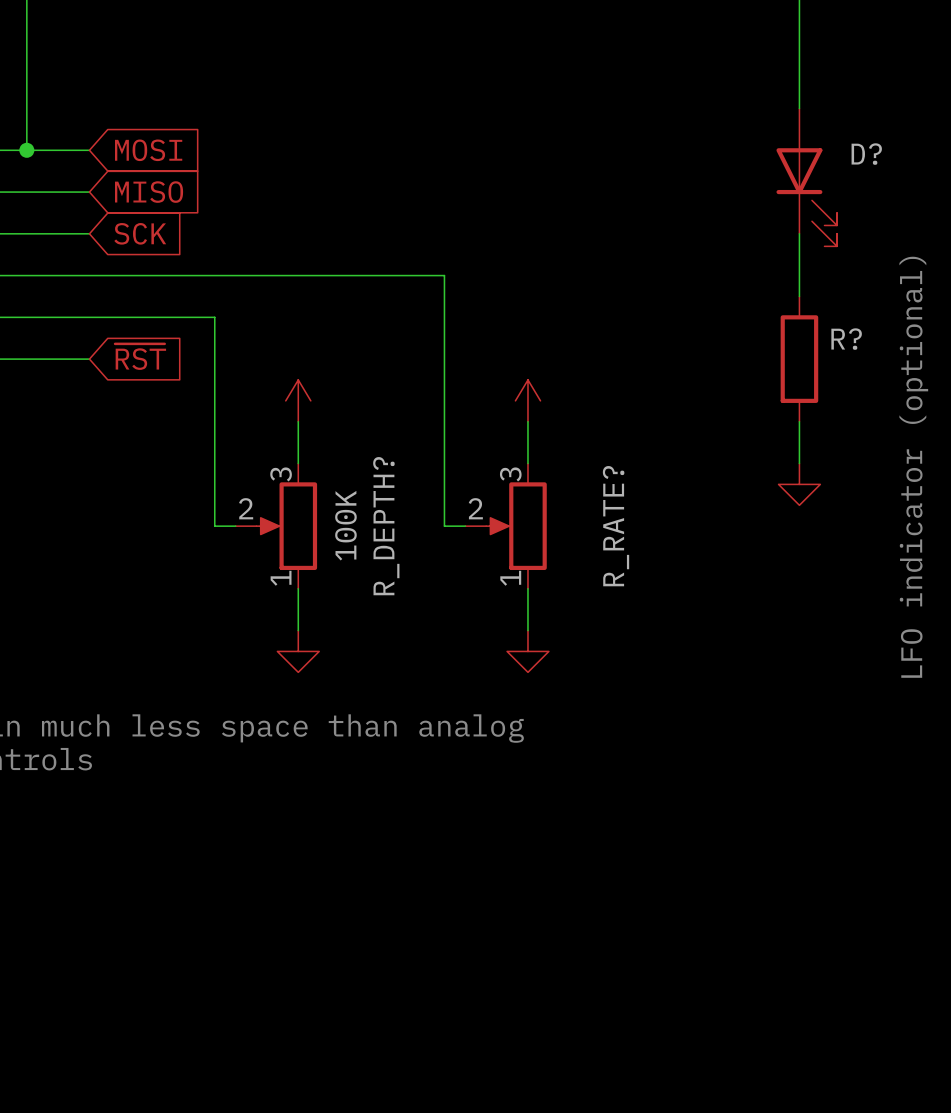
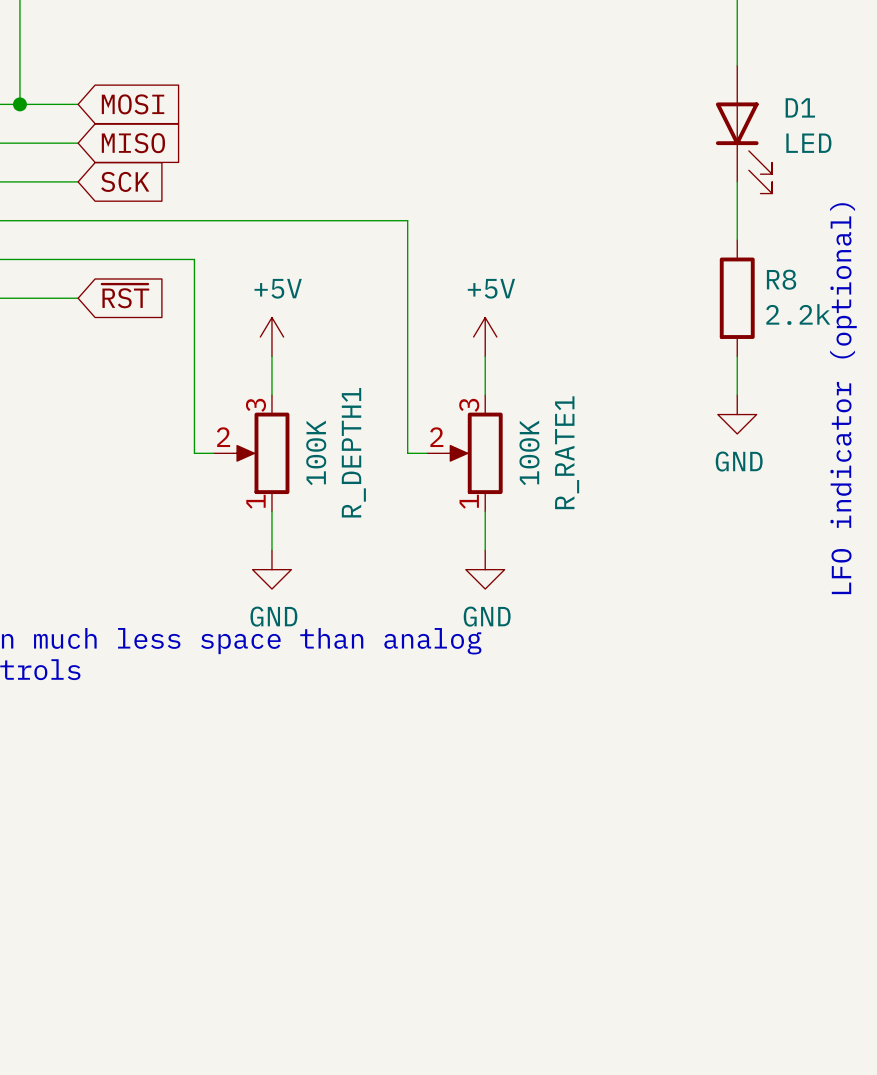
D? name: D? (866, 154) -> D1 (800, 107)
D? value: none -> LED (808, 143)
R? name: R? (846, 339) -> R8 (781, 279)
power symbol text: none -> +5V (278, 288)
power symbol text: none -> +5V (491, 288)
R? value: none -> 2.2k (798, 314)
R_RATE? value: none -> 100K (529, 452)
R_DEPTH? name: R_DEPTH? (386, 526) -> R_DEPTH1 (353, 452)
R_RATE? name: R_RATE? (616, 526) -> R_RATE1 (567, 452)
power symbol text: none -> GND (739, 461)
power symbol text: none -> GND (273, 616)
power symbol text: none -> GND (487, 616)

